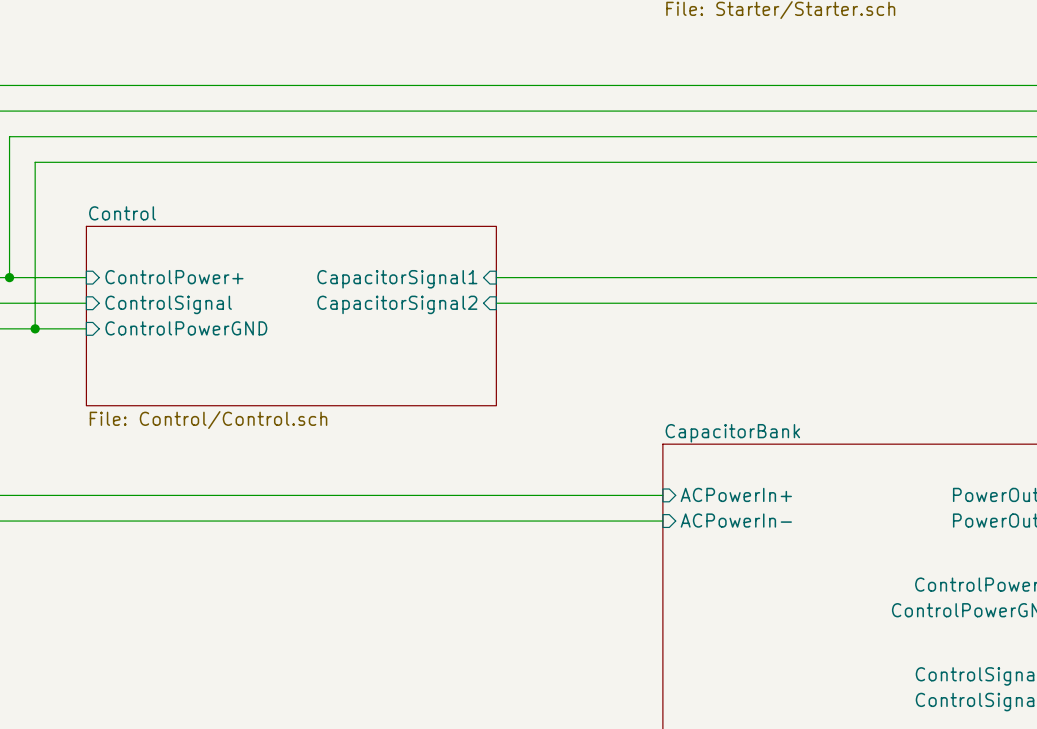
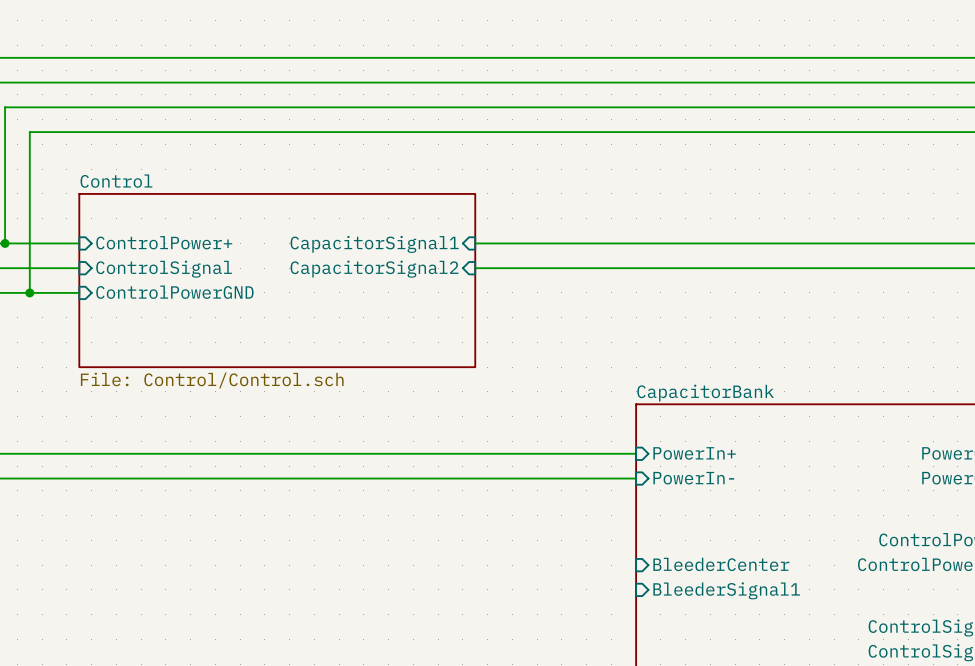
sheet pin: ACPowerIn+ (736, 494) -> PowerIn+ (694, 453)
sheet pin: ACPowerIn- (736, 520) -> PowerIn- (693, 478)
sheet pin: none -> BleederCenter (721, 564)
sheet pin: none -> BleederSignal1 (726, 590)

